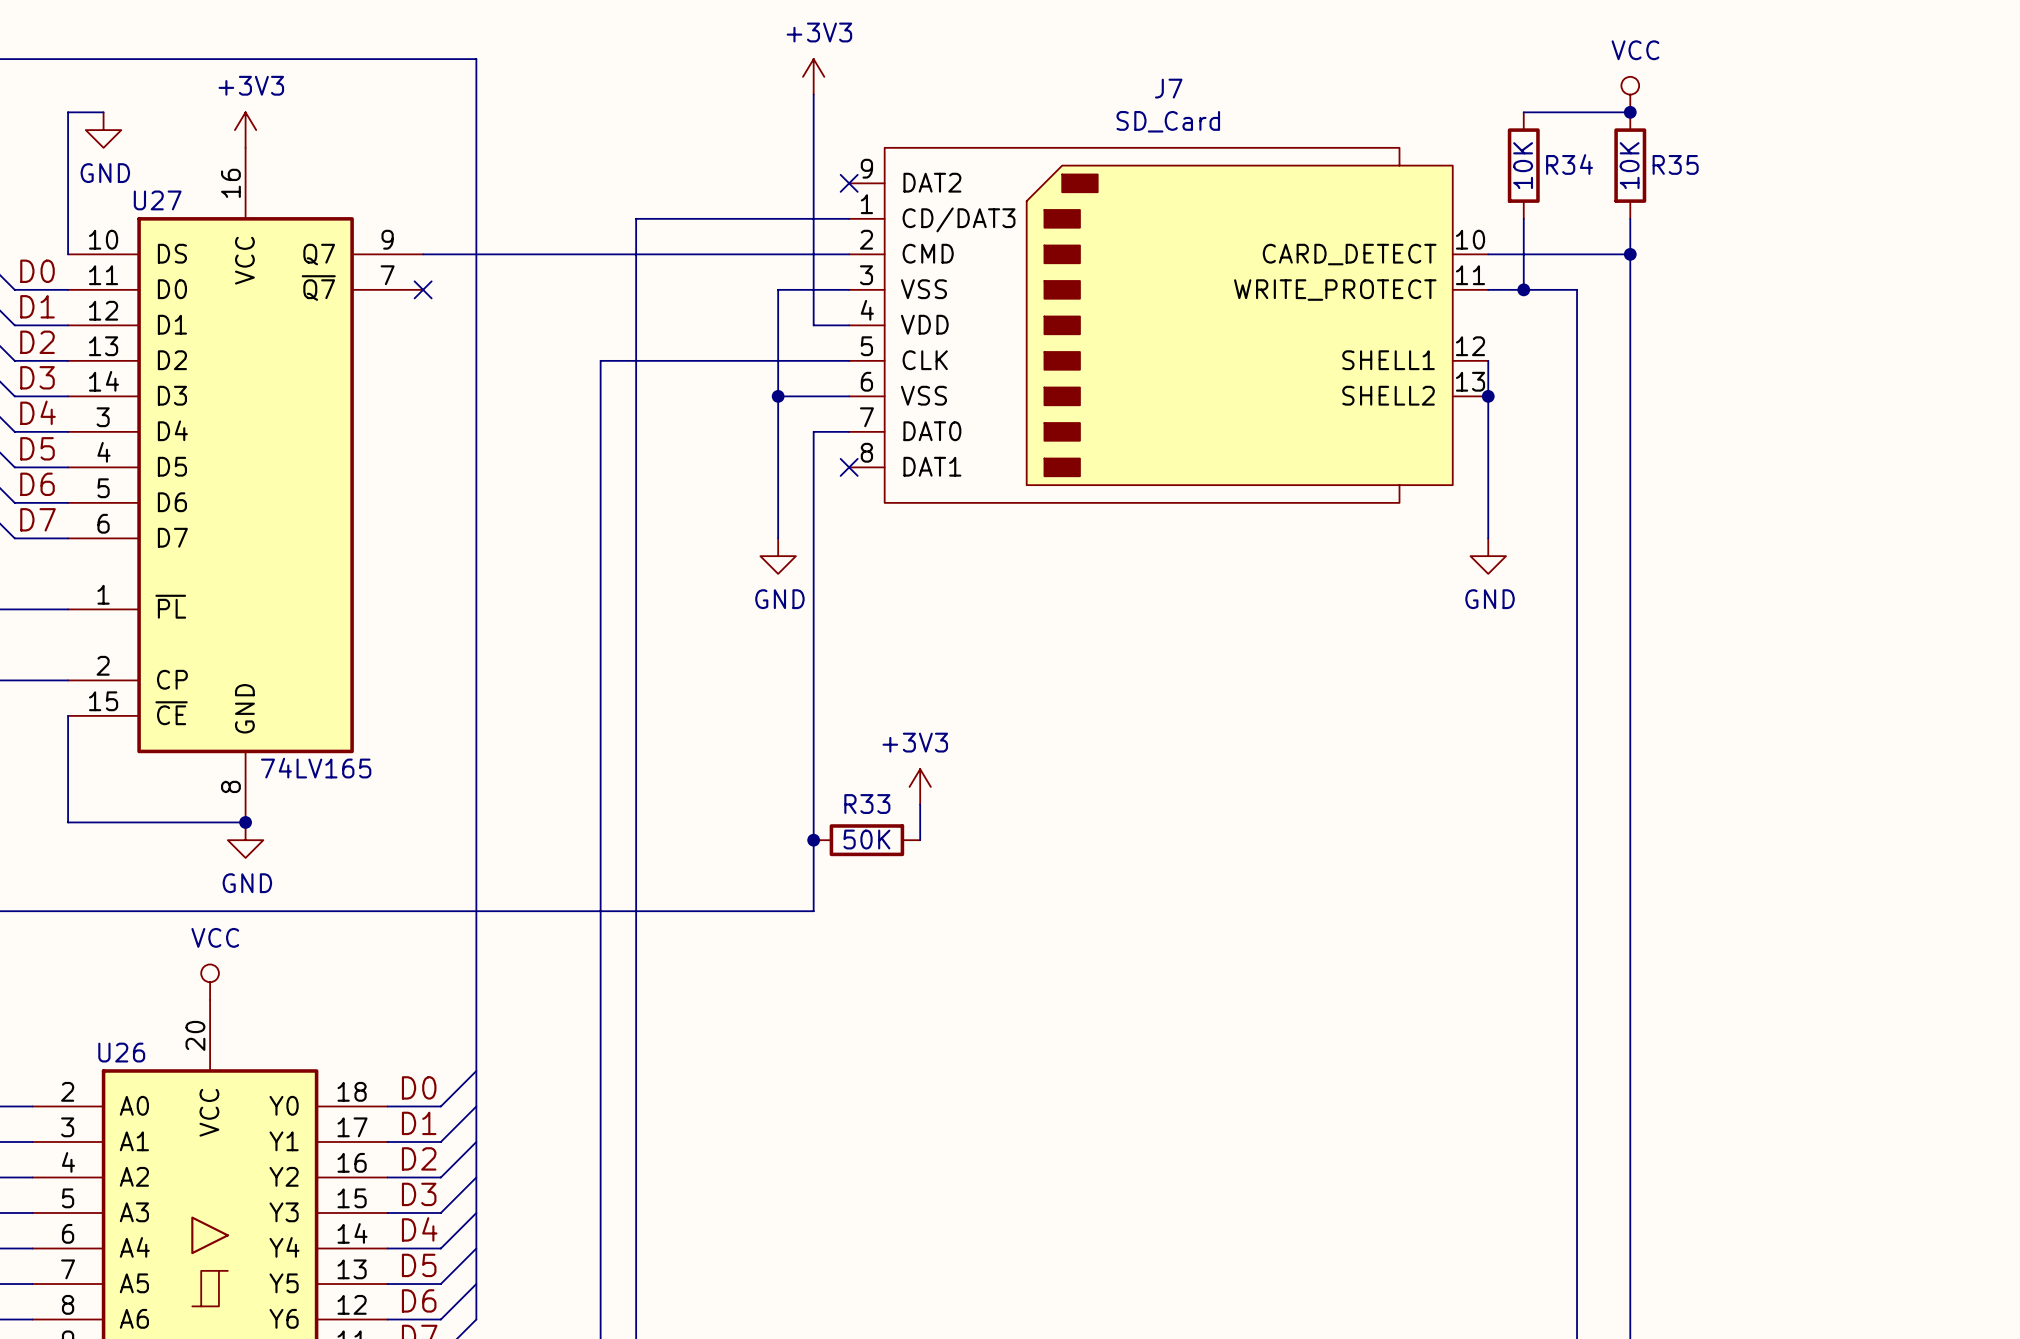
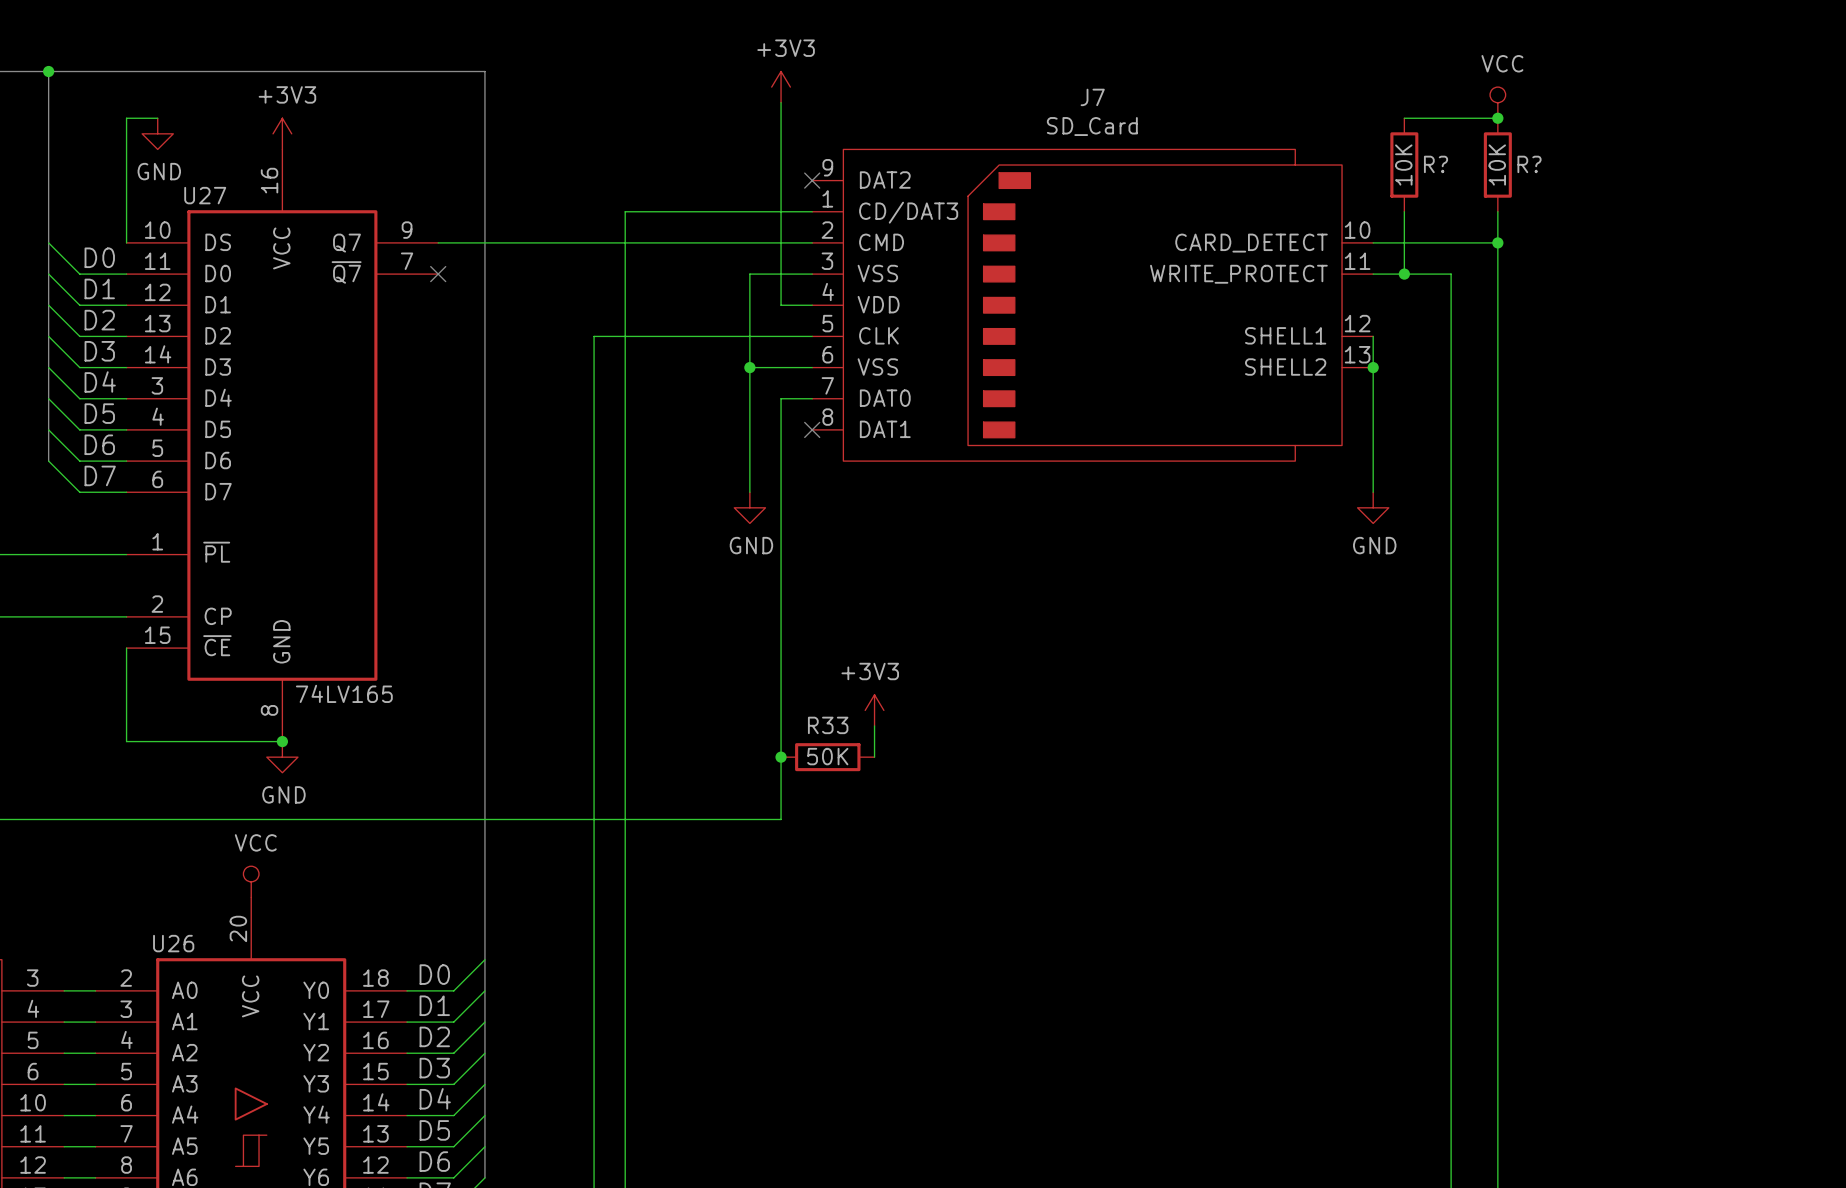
R34 name: R34 (1569, 164) -> R? (1436, 164)
R35 name: R35 (1675, 164) -> R? (1529, 164)

